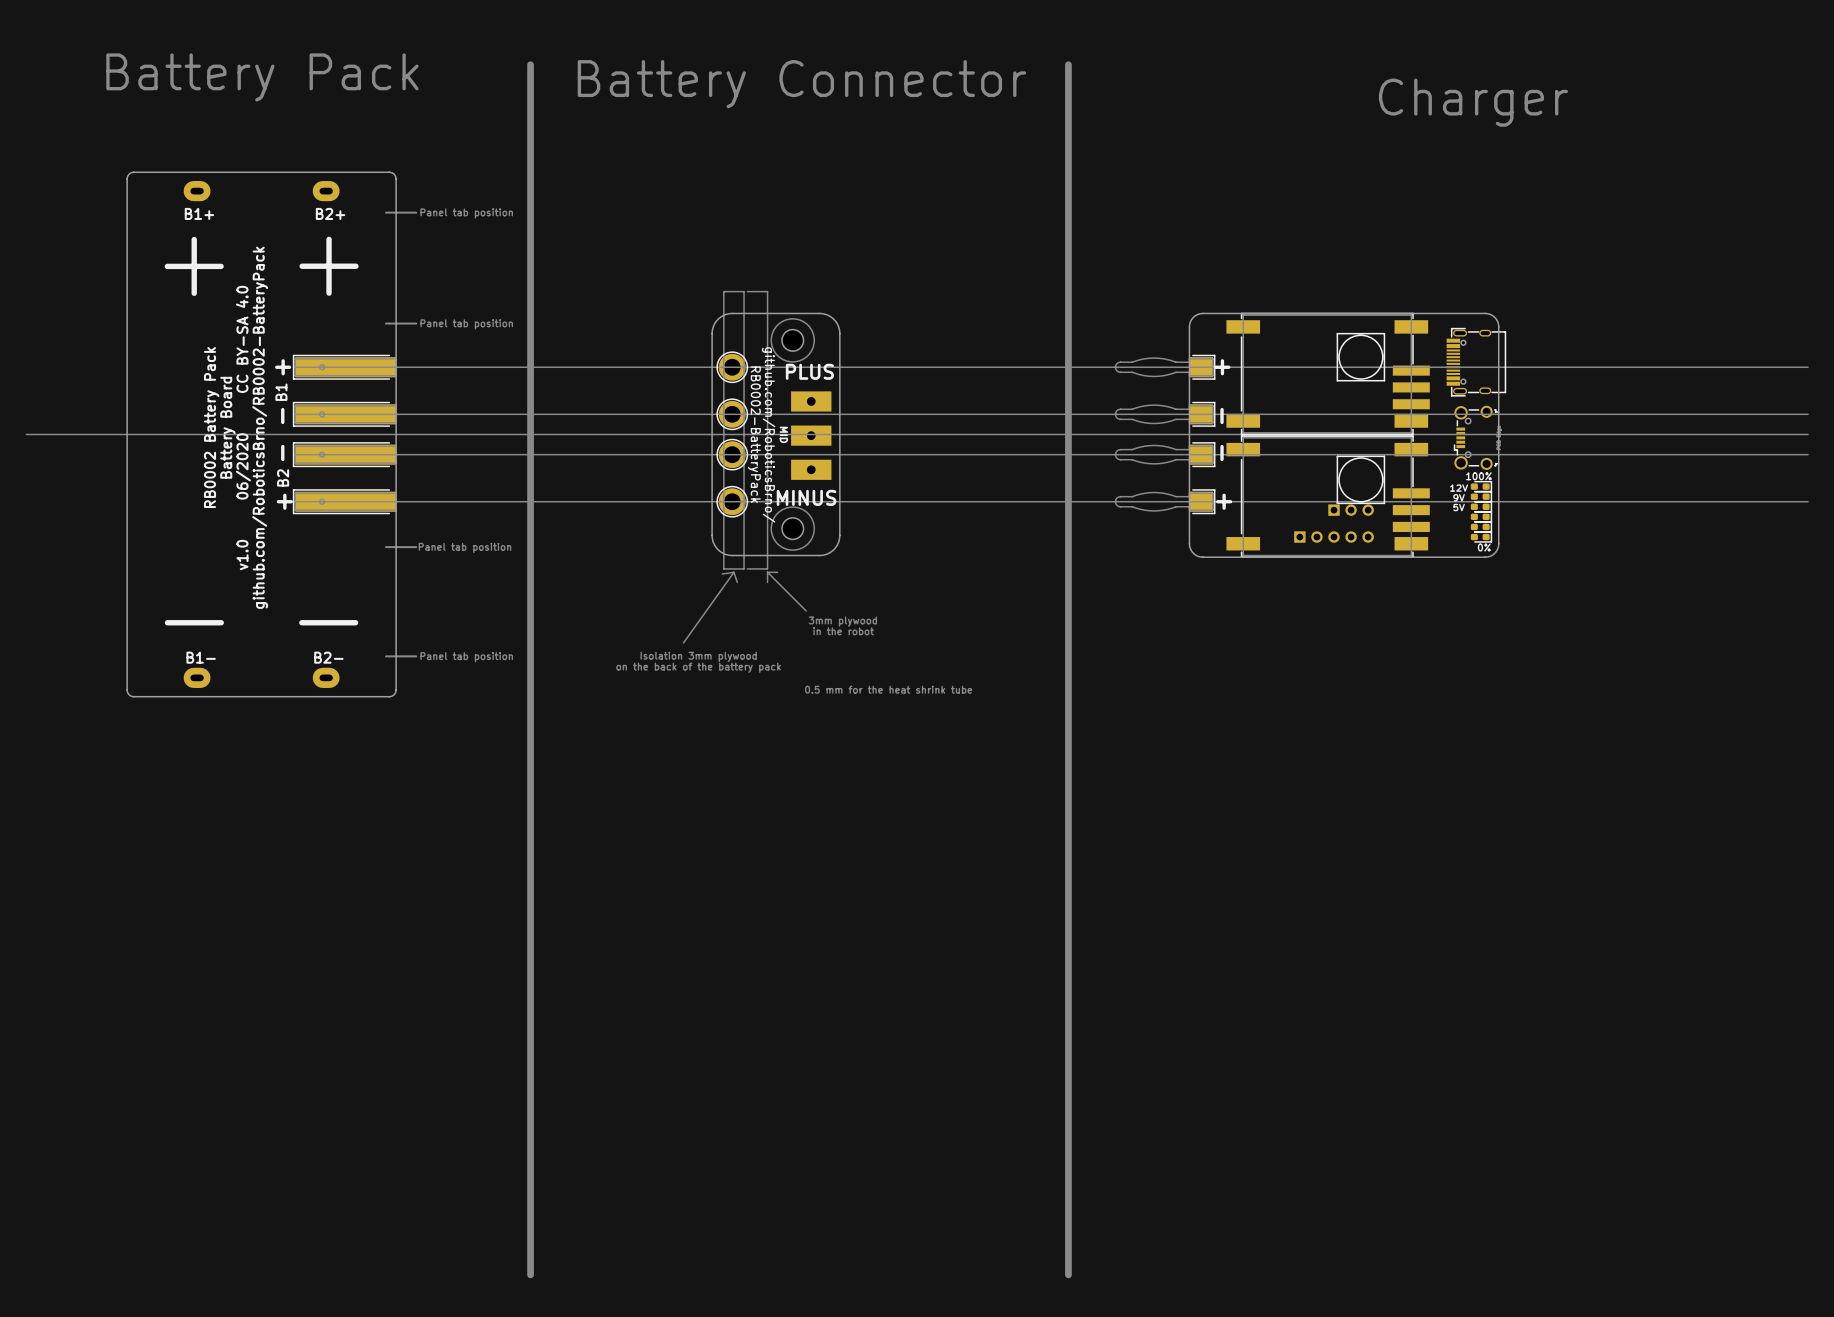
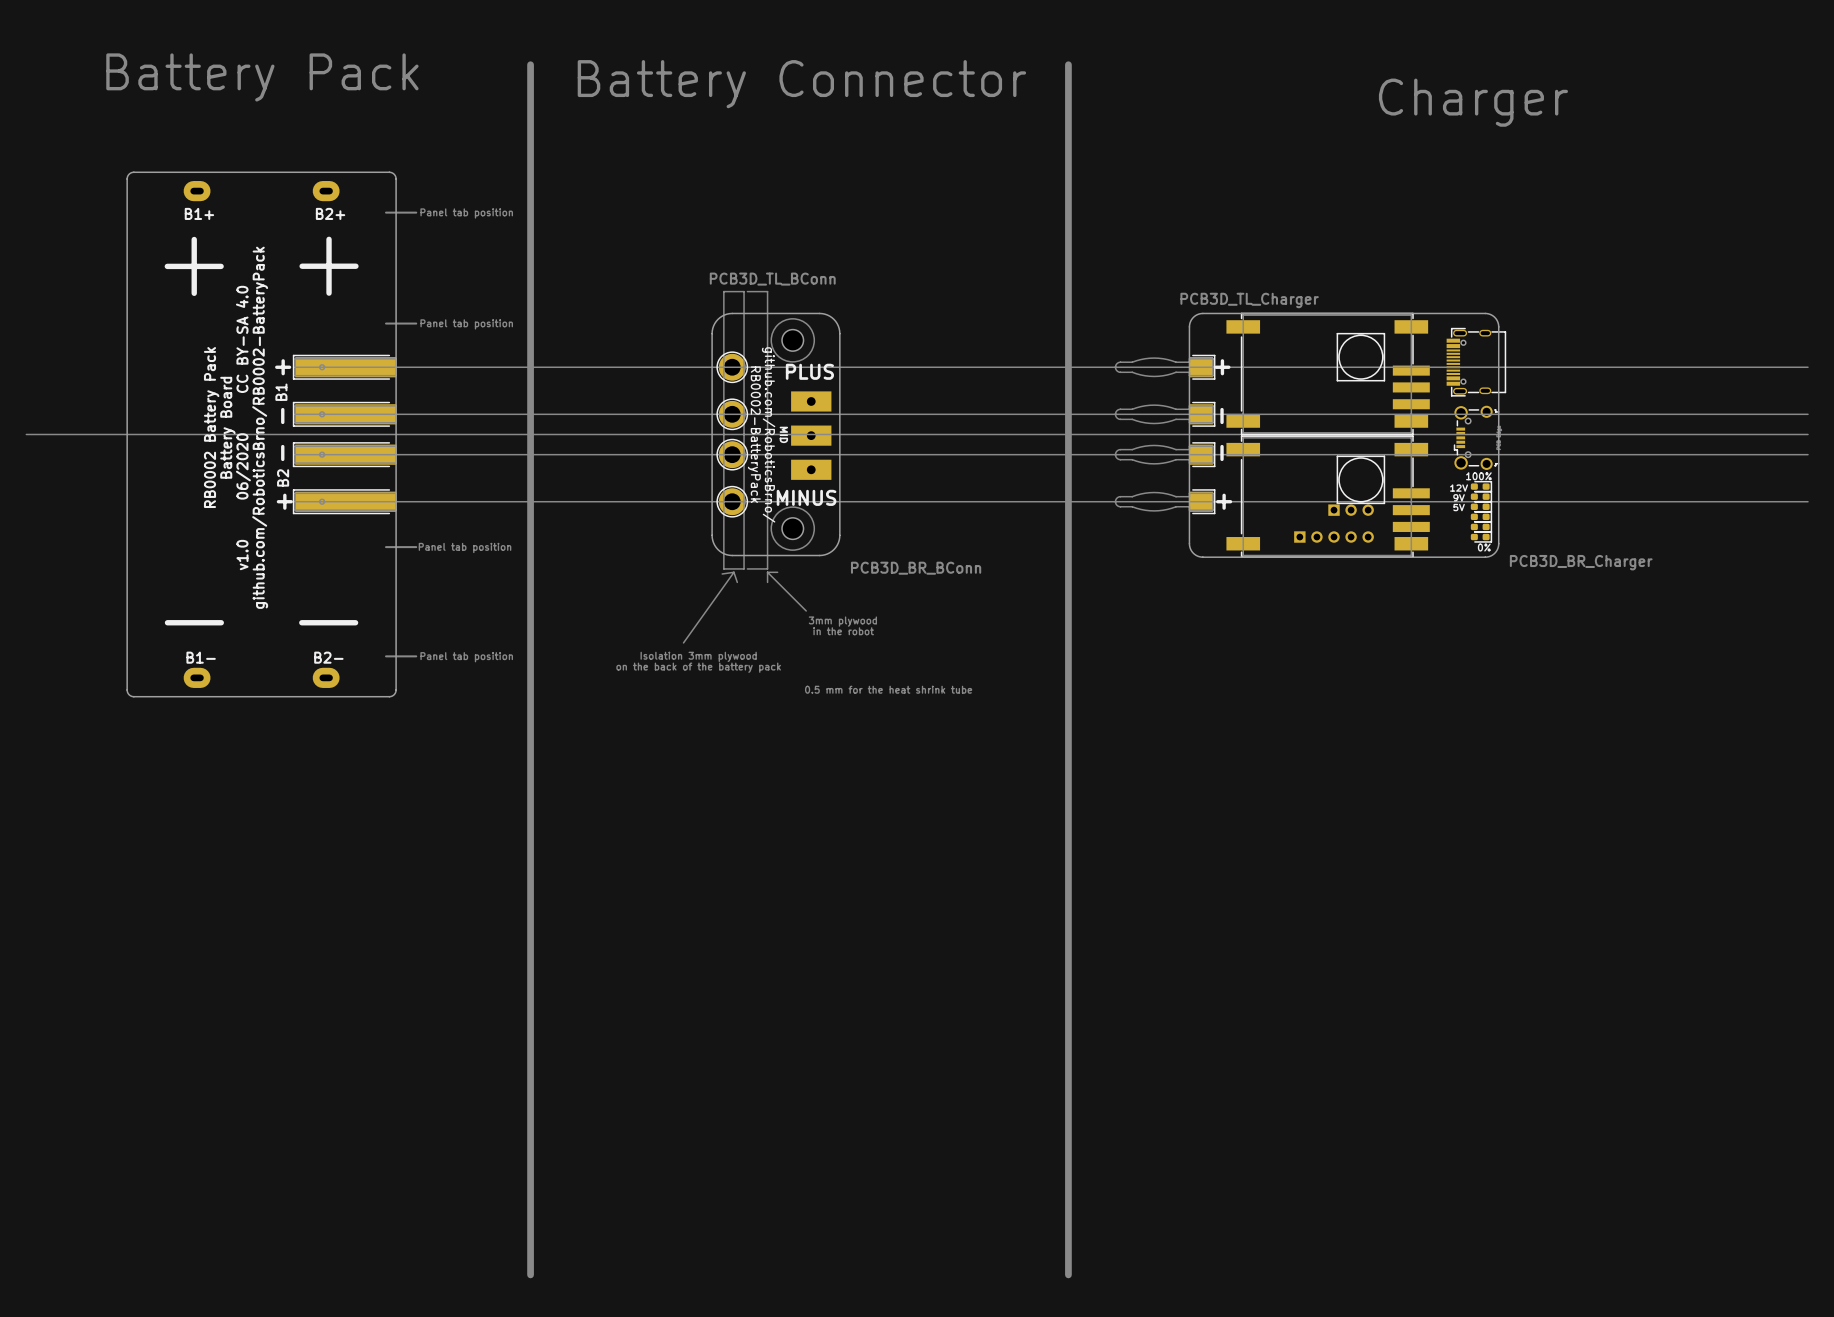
text: none -> PCB3D_TL_BConn (772, 279)
text: none -> PCB3D_TL_Charger (1249, 300)
text: none -> PCB3D_BR_Charger (1581, 562)
text: none -> PCB3D_BR_BConn (916, 568)

